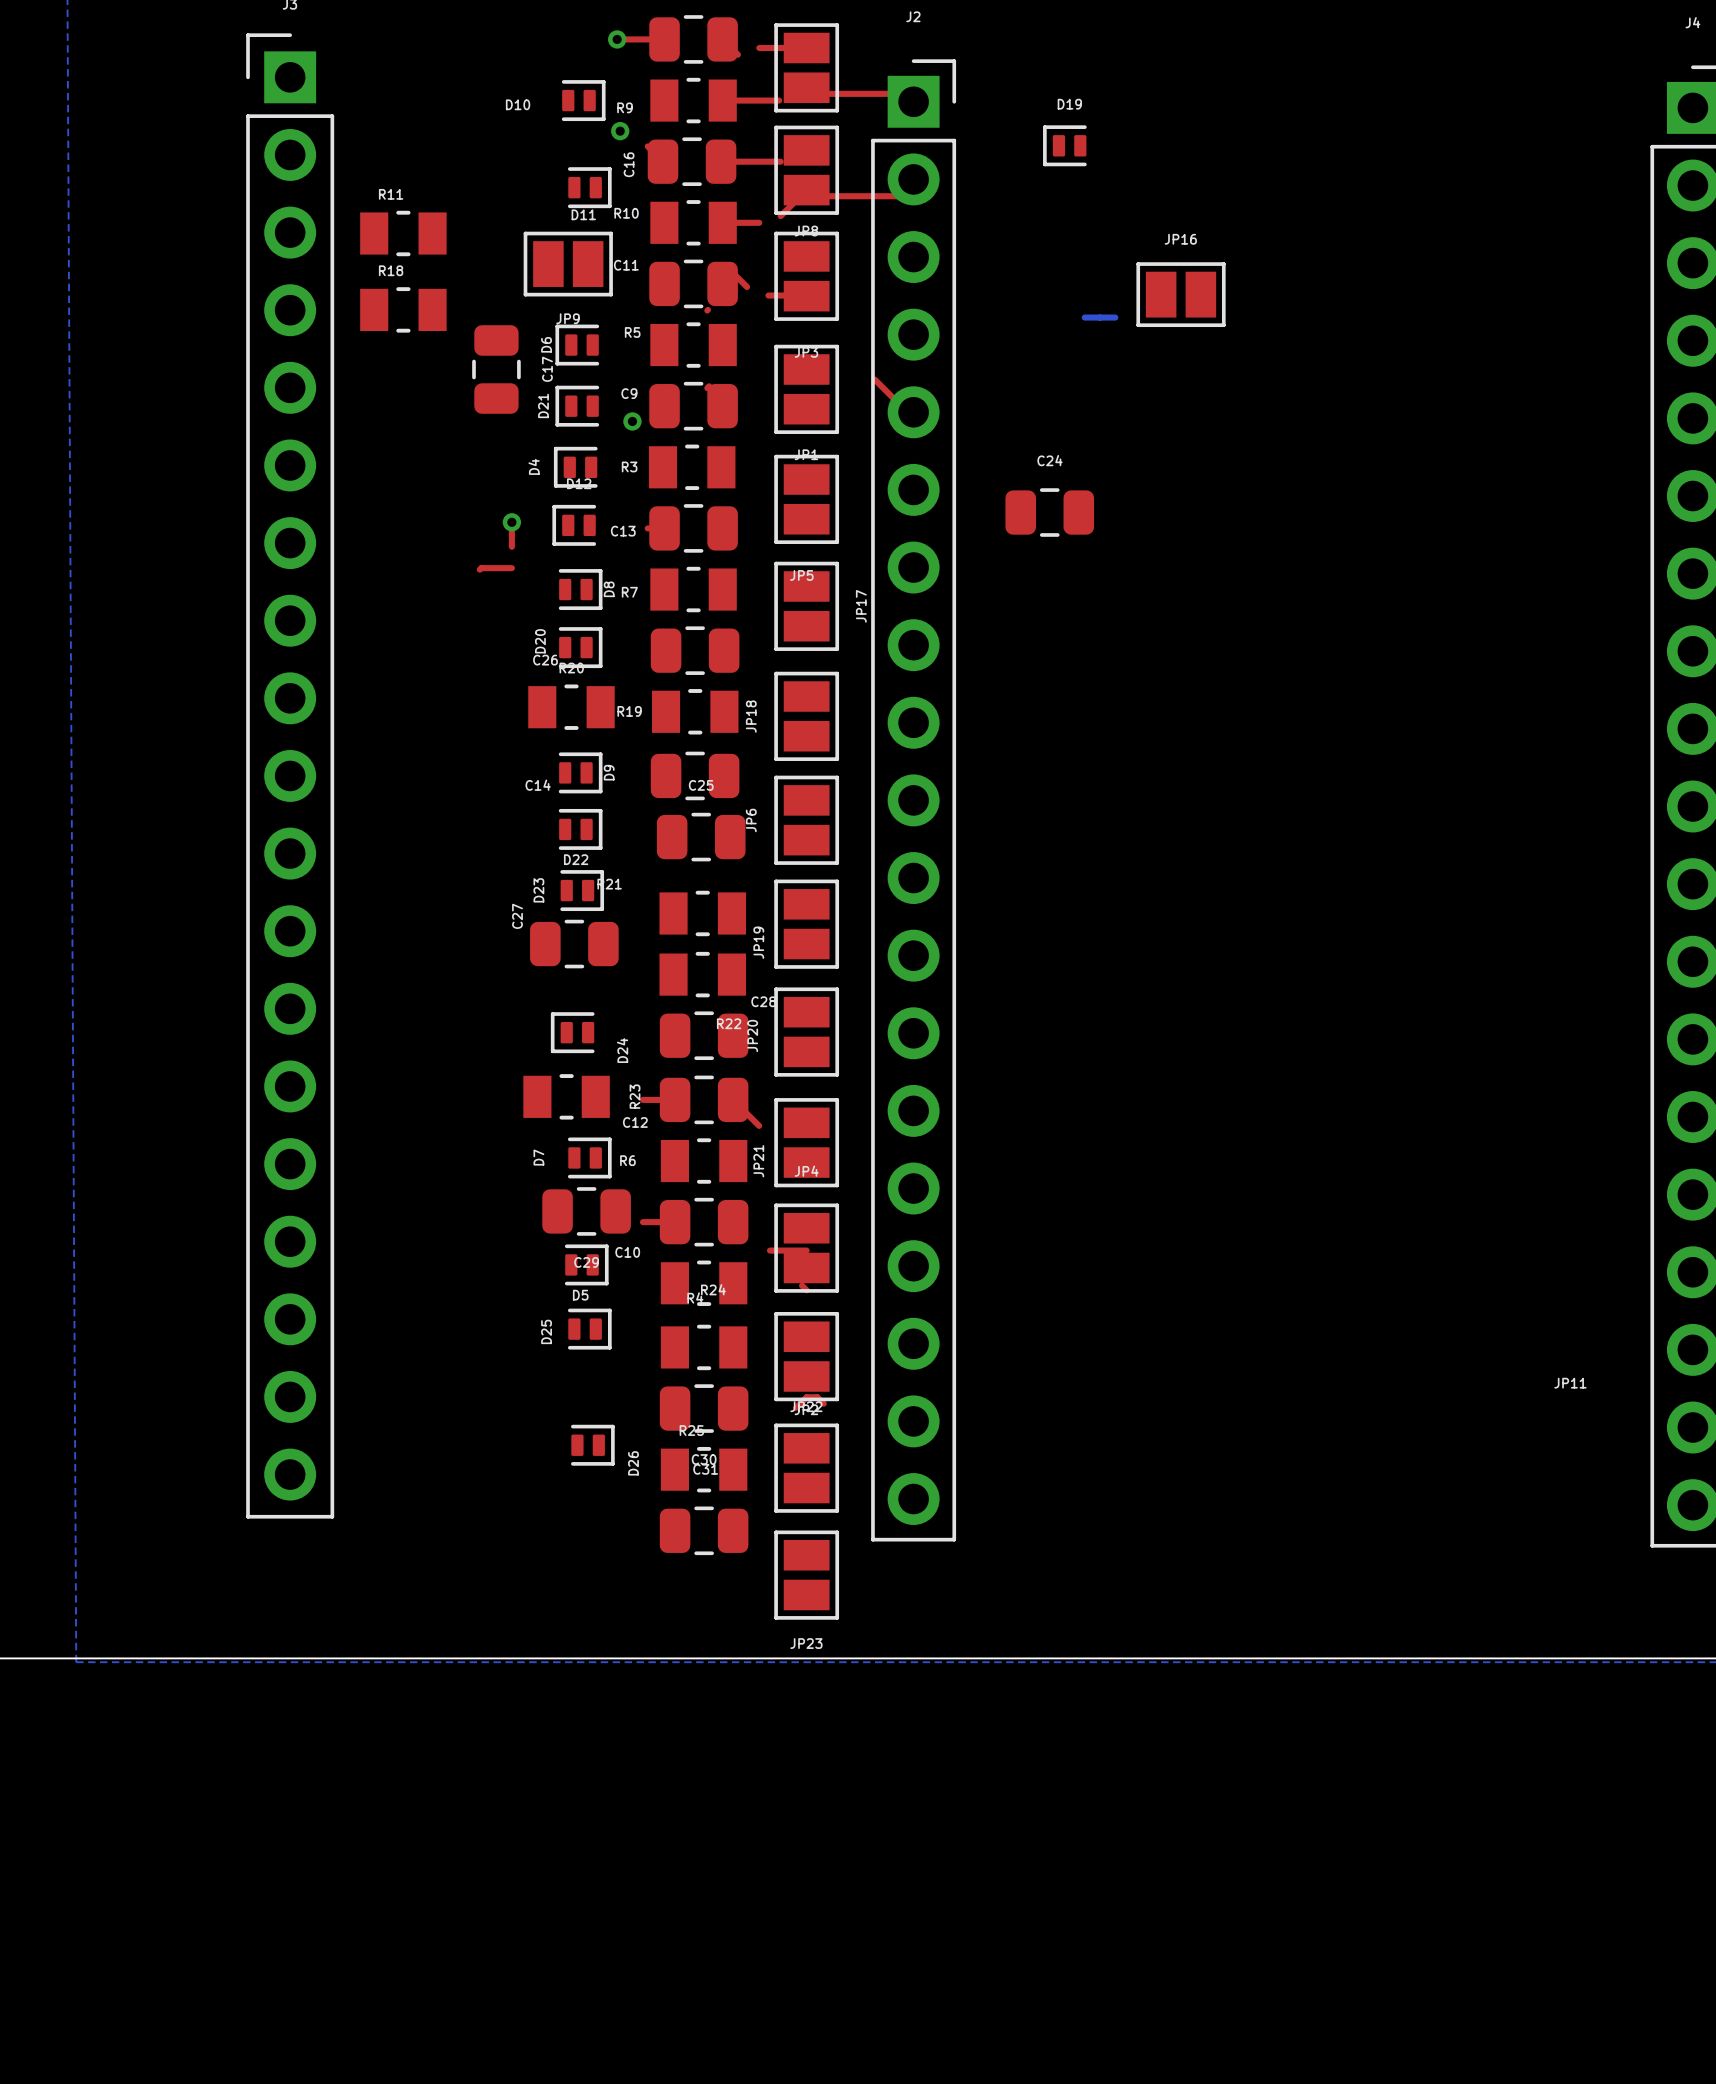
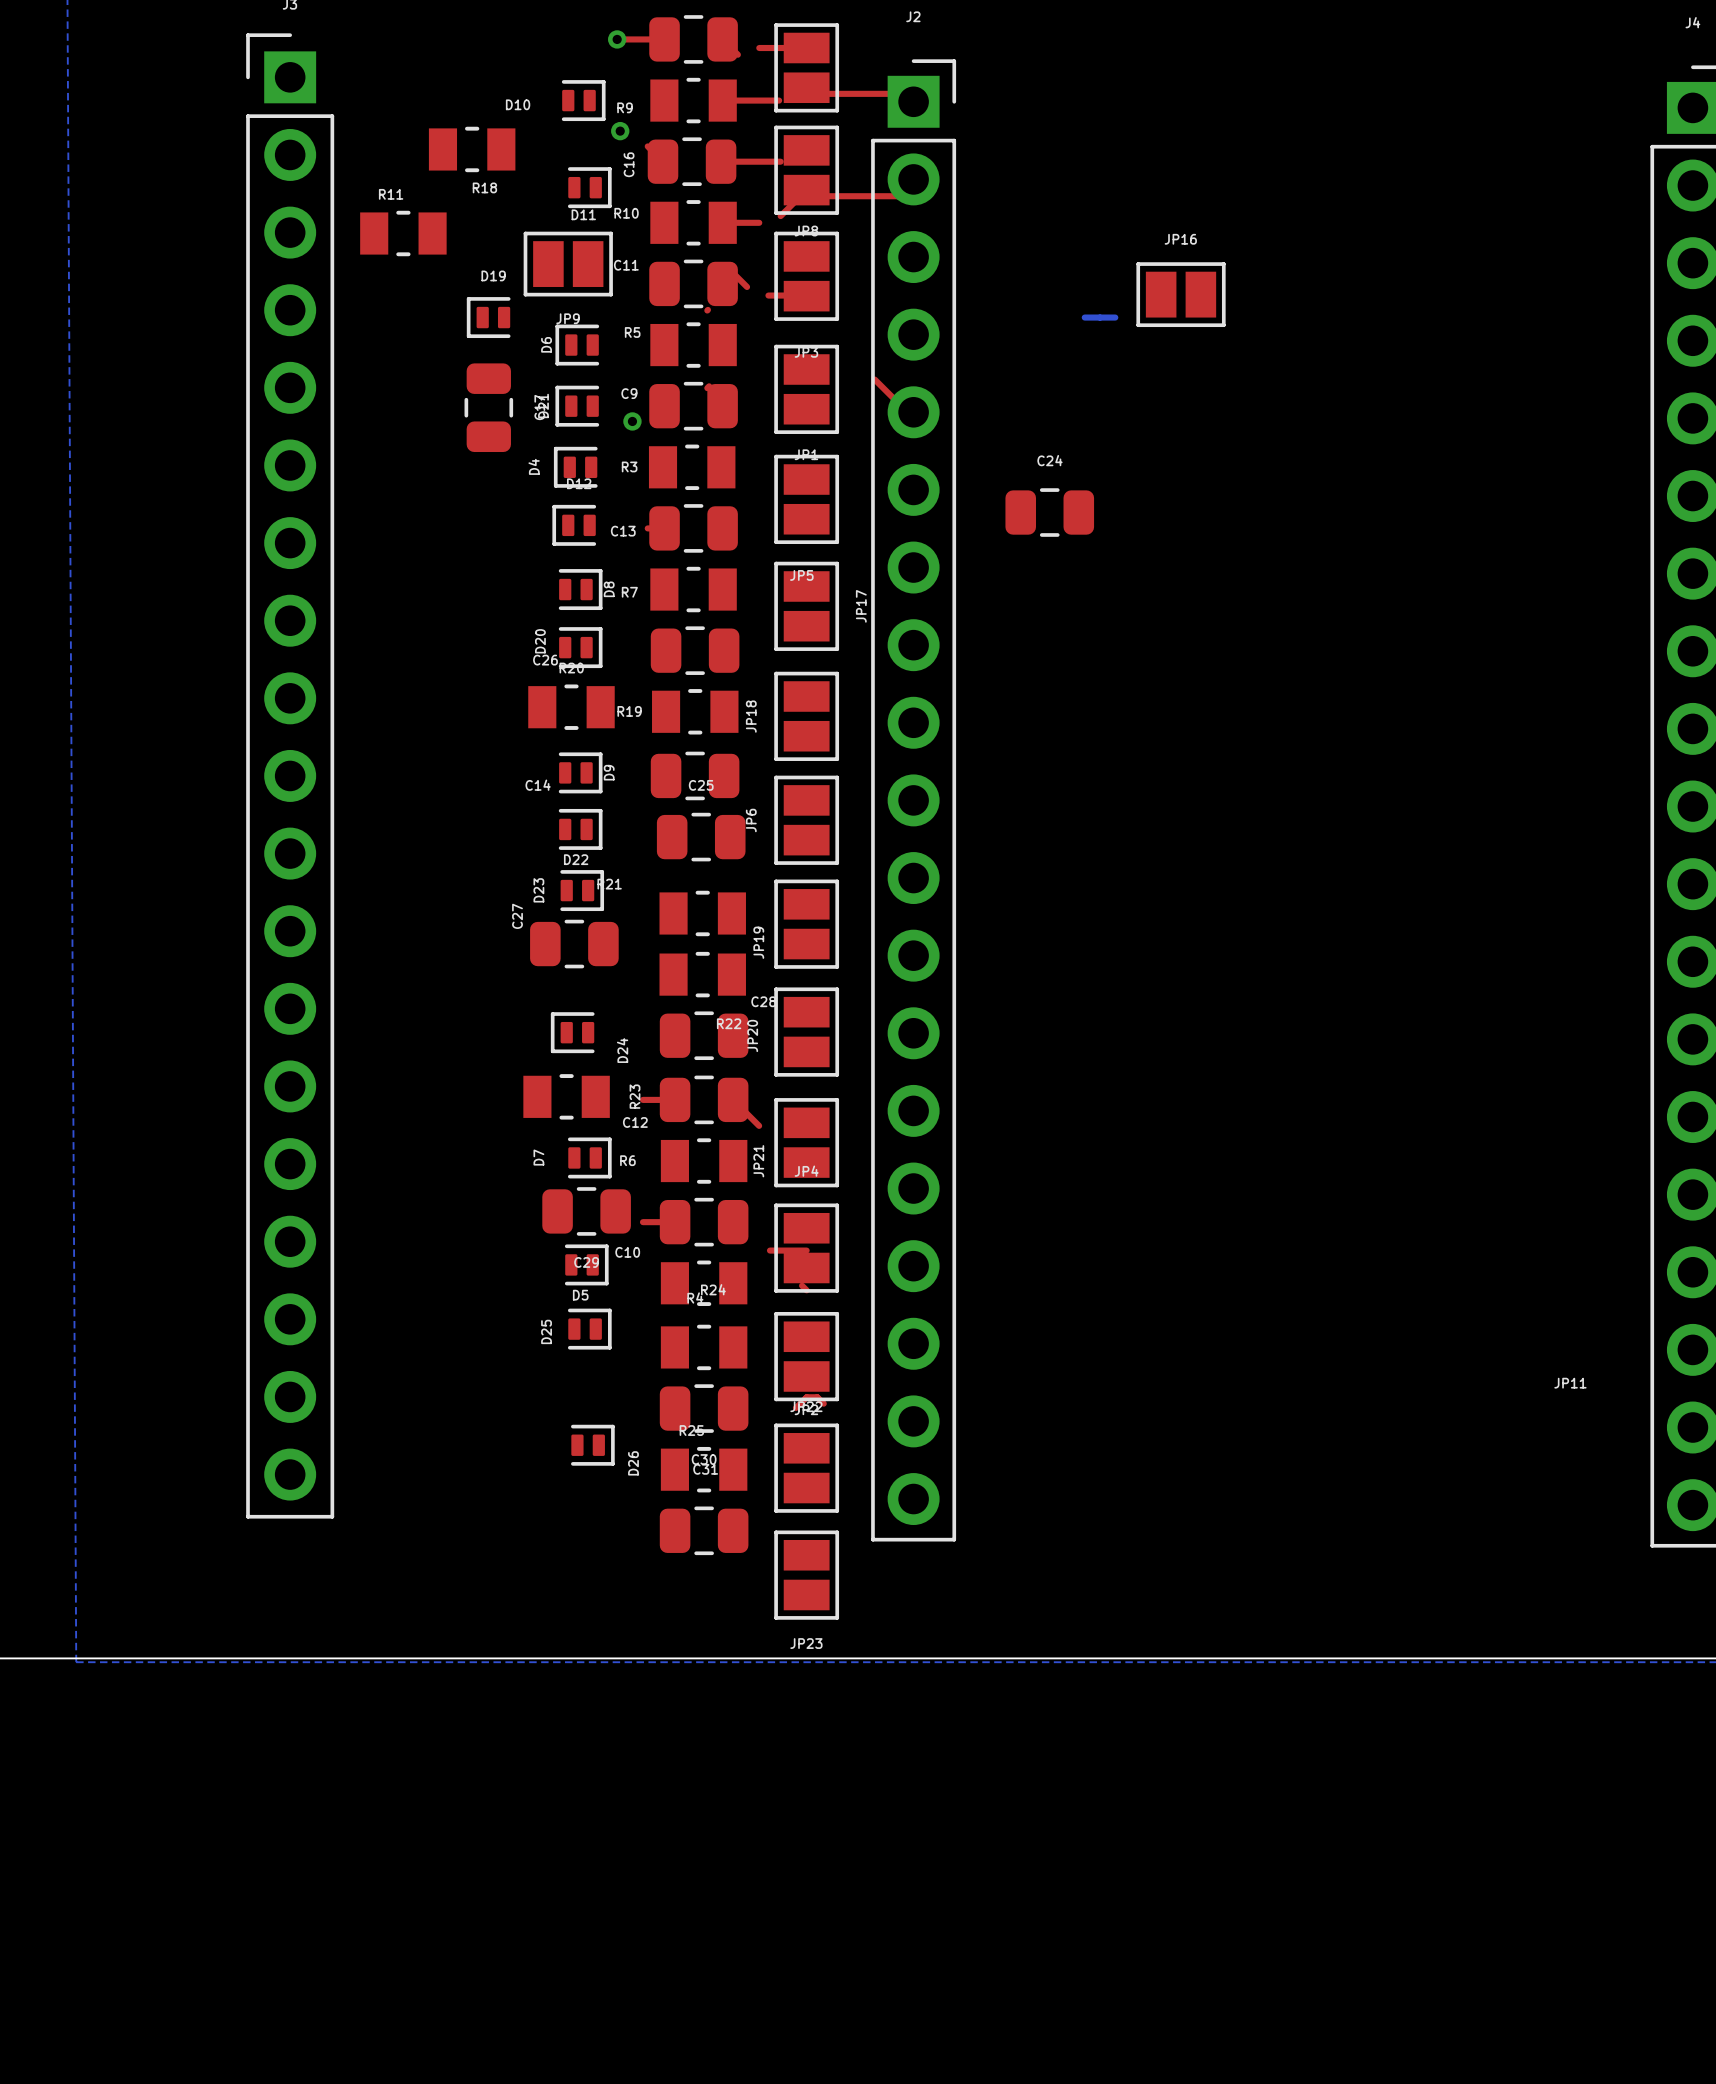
D19 position: (1064, 145) -> (488, 317)
R18 name position: R18 (391, 270) -> R18 (484, 187)
R18 position: (403, 309) -> (472, 149)
C17 position: (496, 369) -> (488, 407)
top track: (511, 522) (511, 546) -> none
via: (511, 522) -> none
top track: (511, 568) (479, 569) -> none

